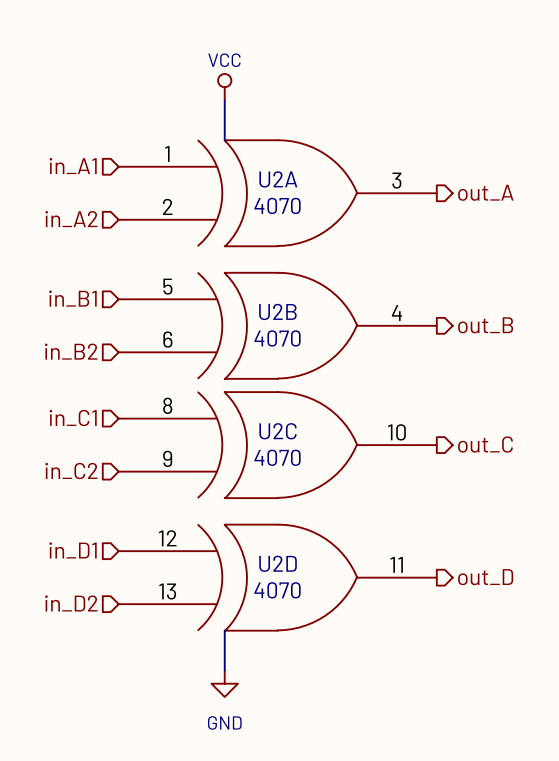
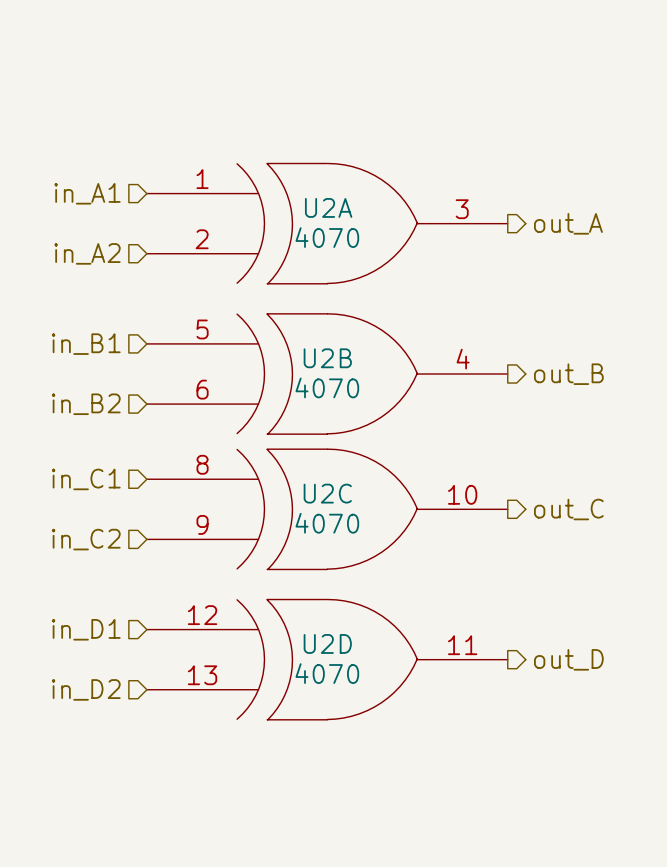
power symbol: VCC (224, 87) -> none
wire: (224, 100) (224, 140) -> none
wire: (224, 630) (224, 670) -> none
power symbol: GND (224, 683) -> none

